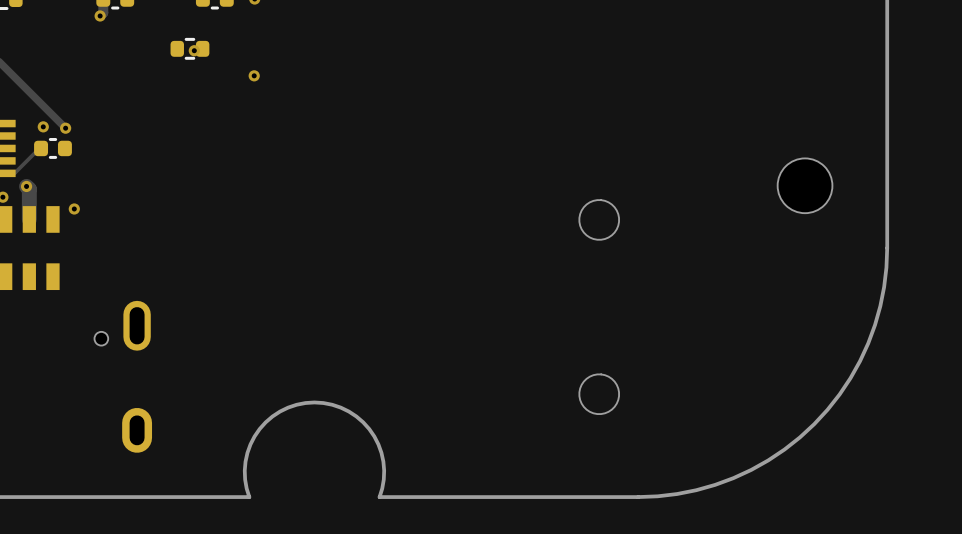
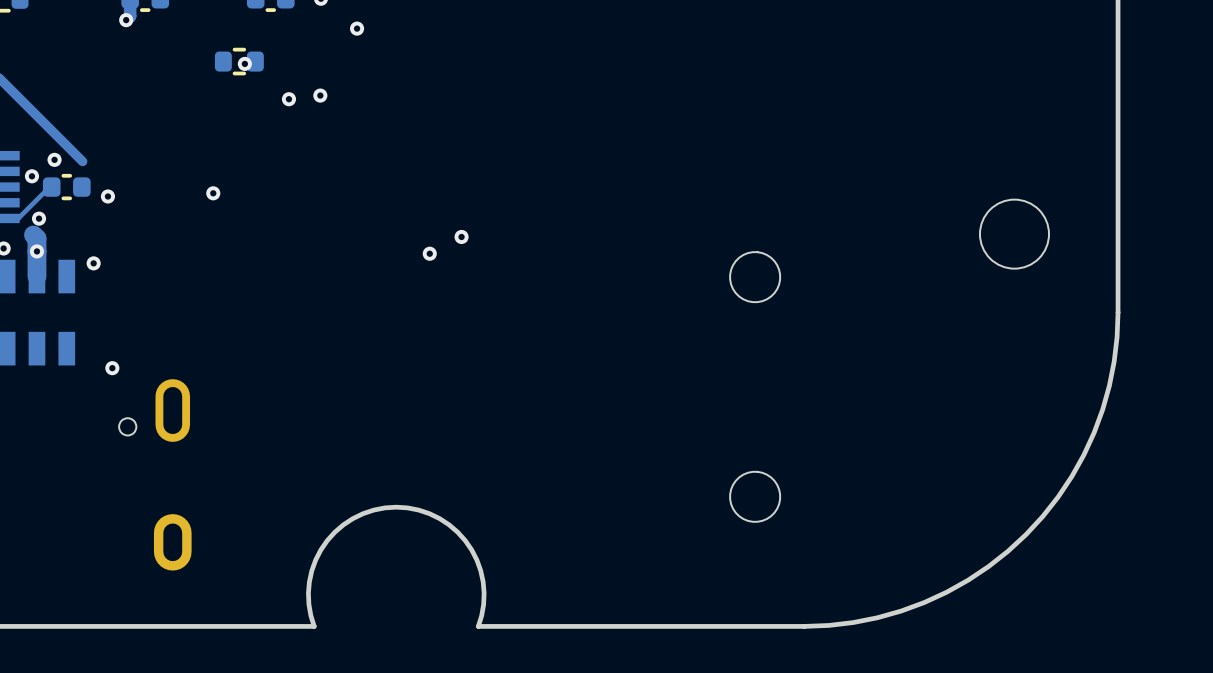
via: none -> (357, 28)
via: none -> (288, 99)
via: (65, 128) -> none
via: none -> (31, 176)
via: none -> (213, 193)
via: none -> (107, 196)
via: none -> (39, 218)
via: (26, 186) -> none
via: none -> (461, 236)
via: none -> (36, 251)
via: none -> (429, 253)
via: none -> (112, 368)

